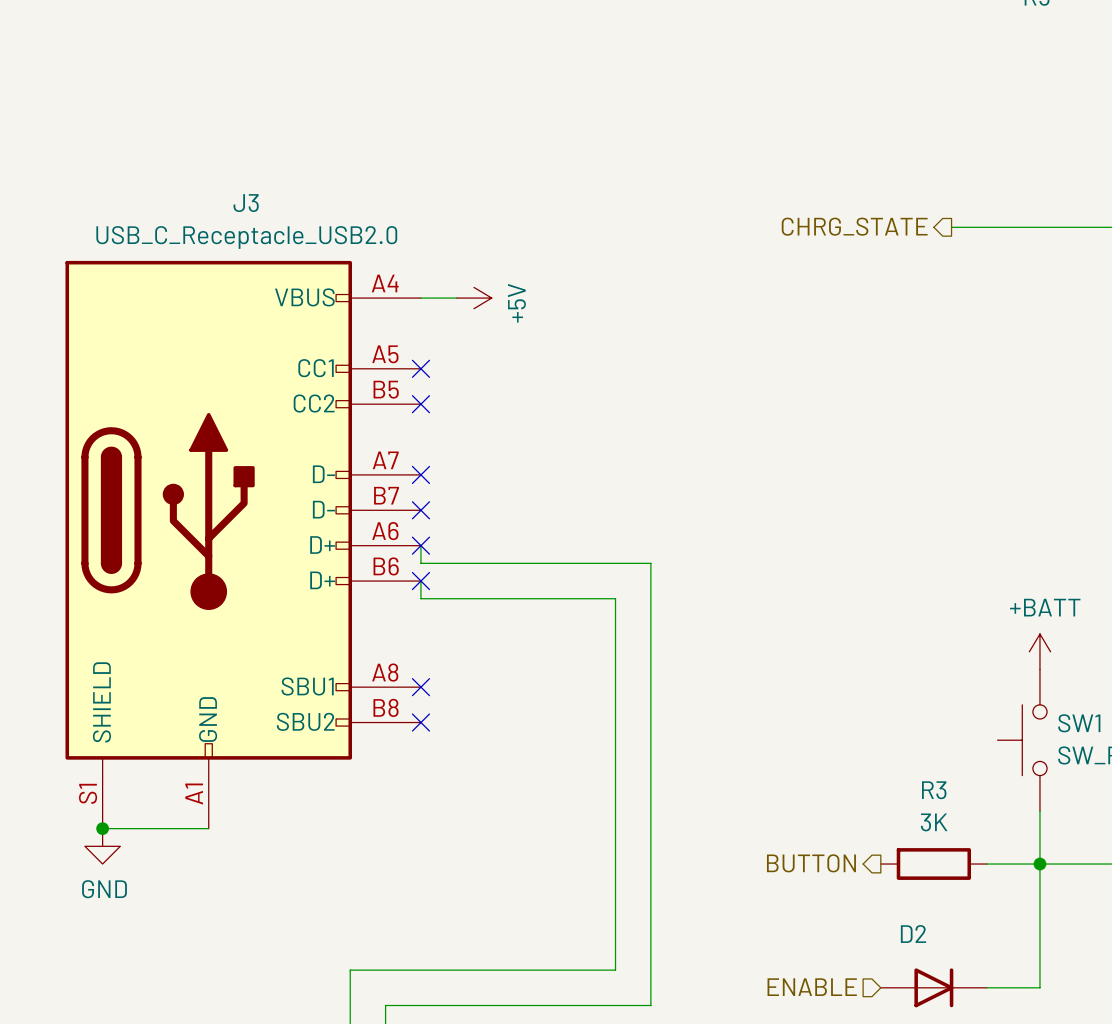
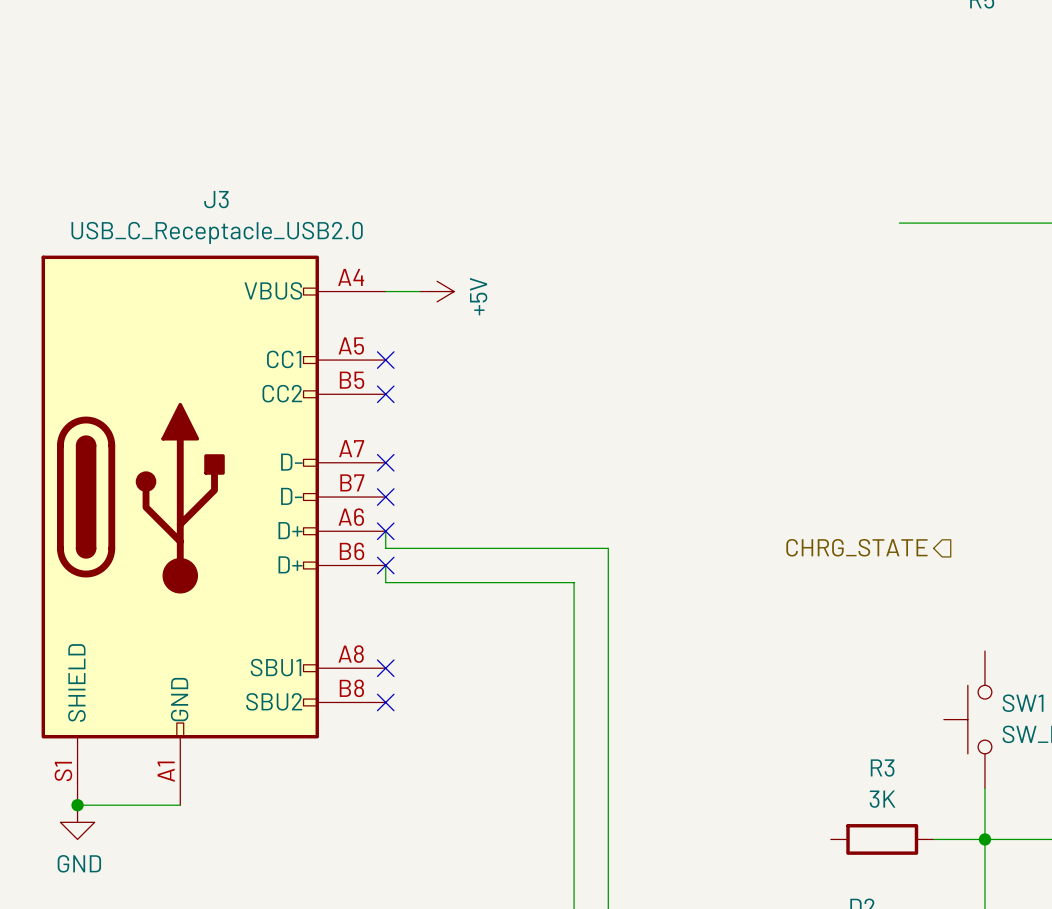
hierarchical label position: CHRG_STATE (854, 226) -> CHRG_STATE (856, 547)
power symbol: +BATT (1039, 651) -> none
hierarchical label: BUTTON (811, 863) -> none

